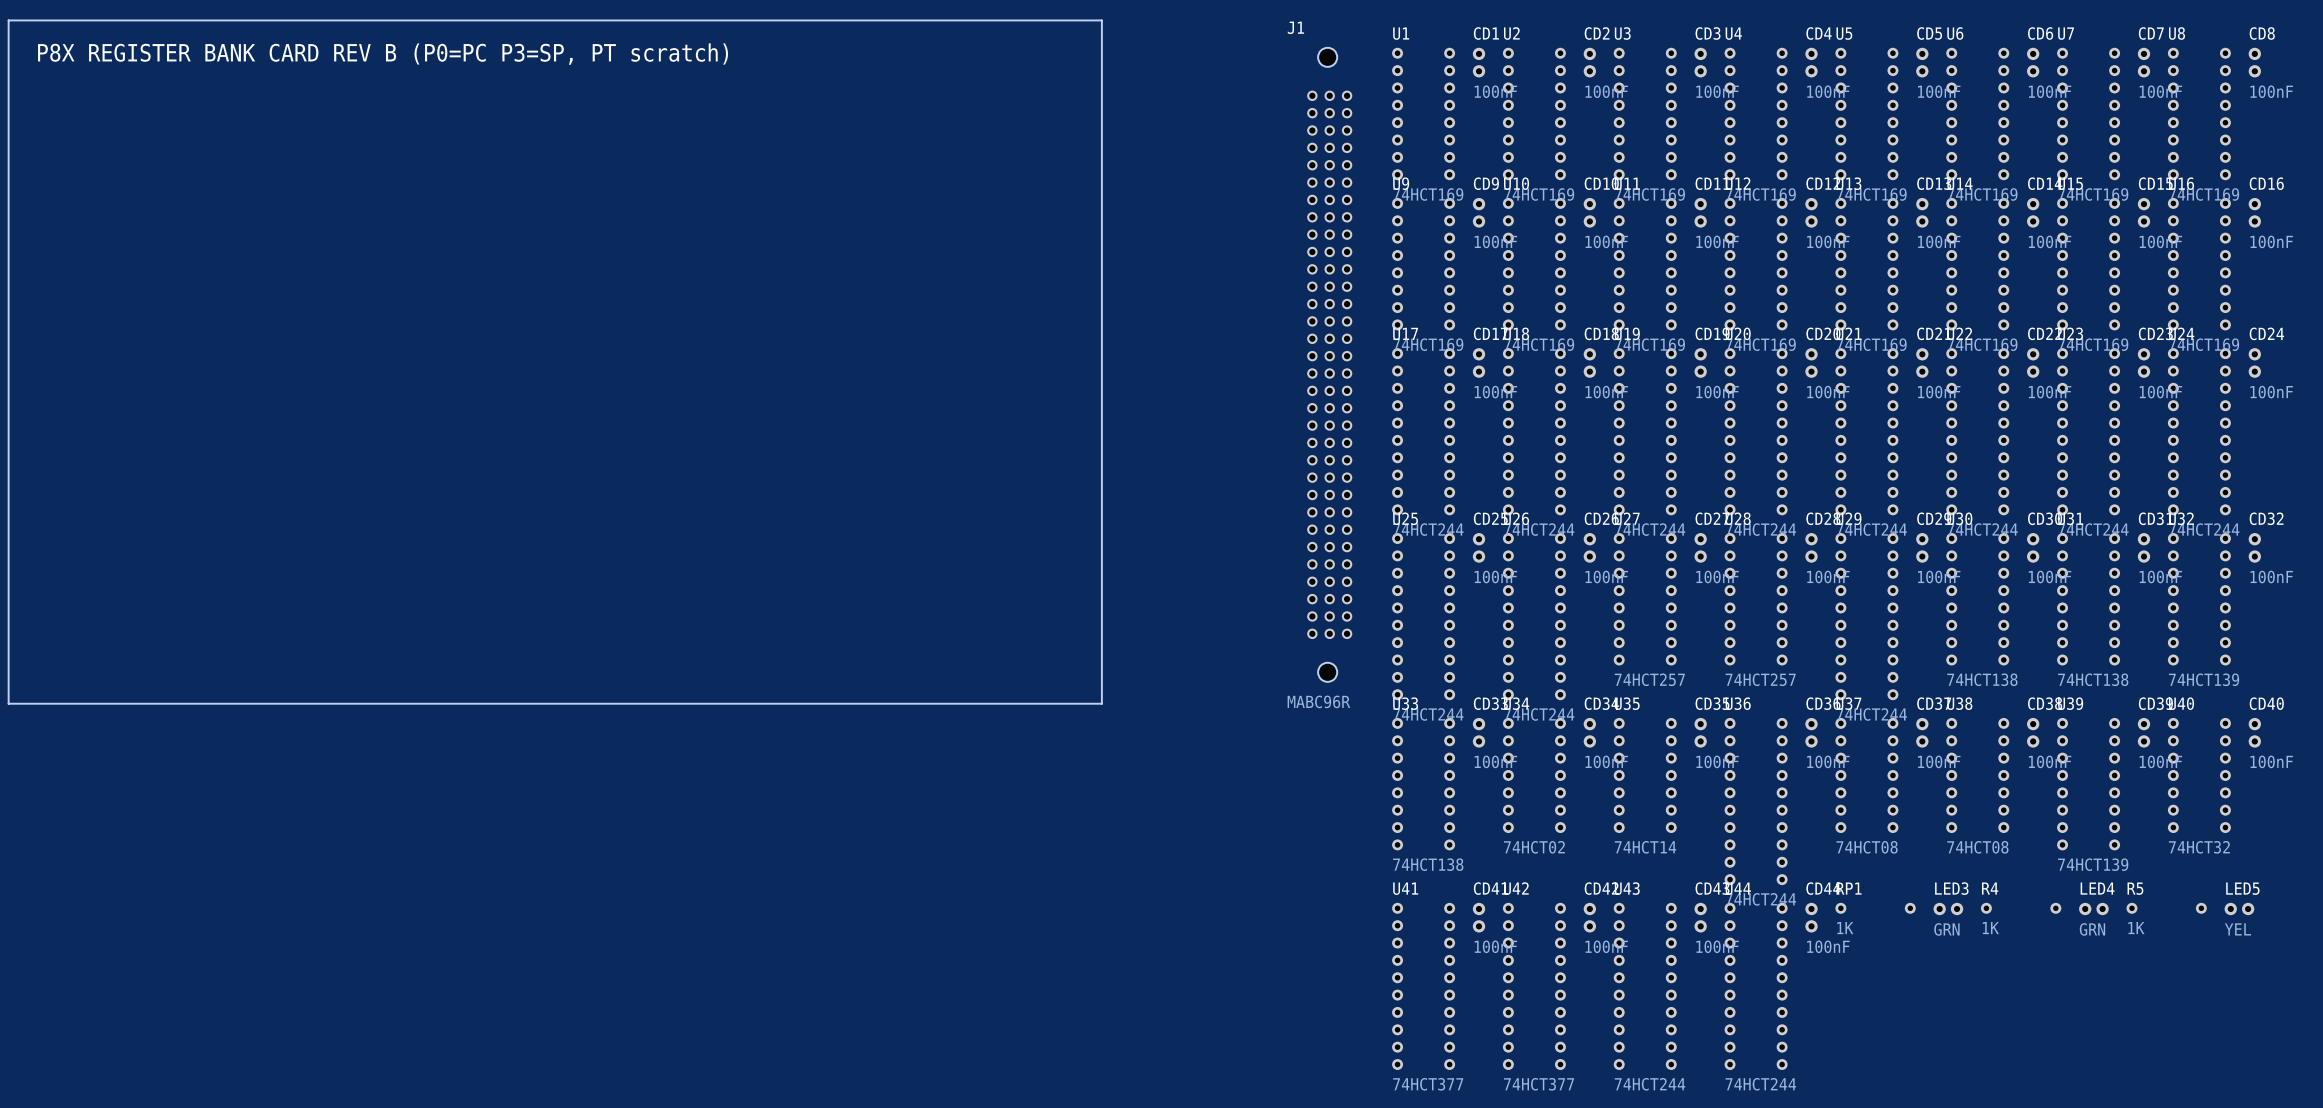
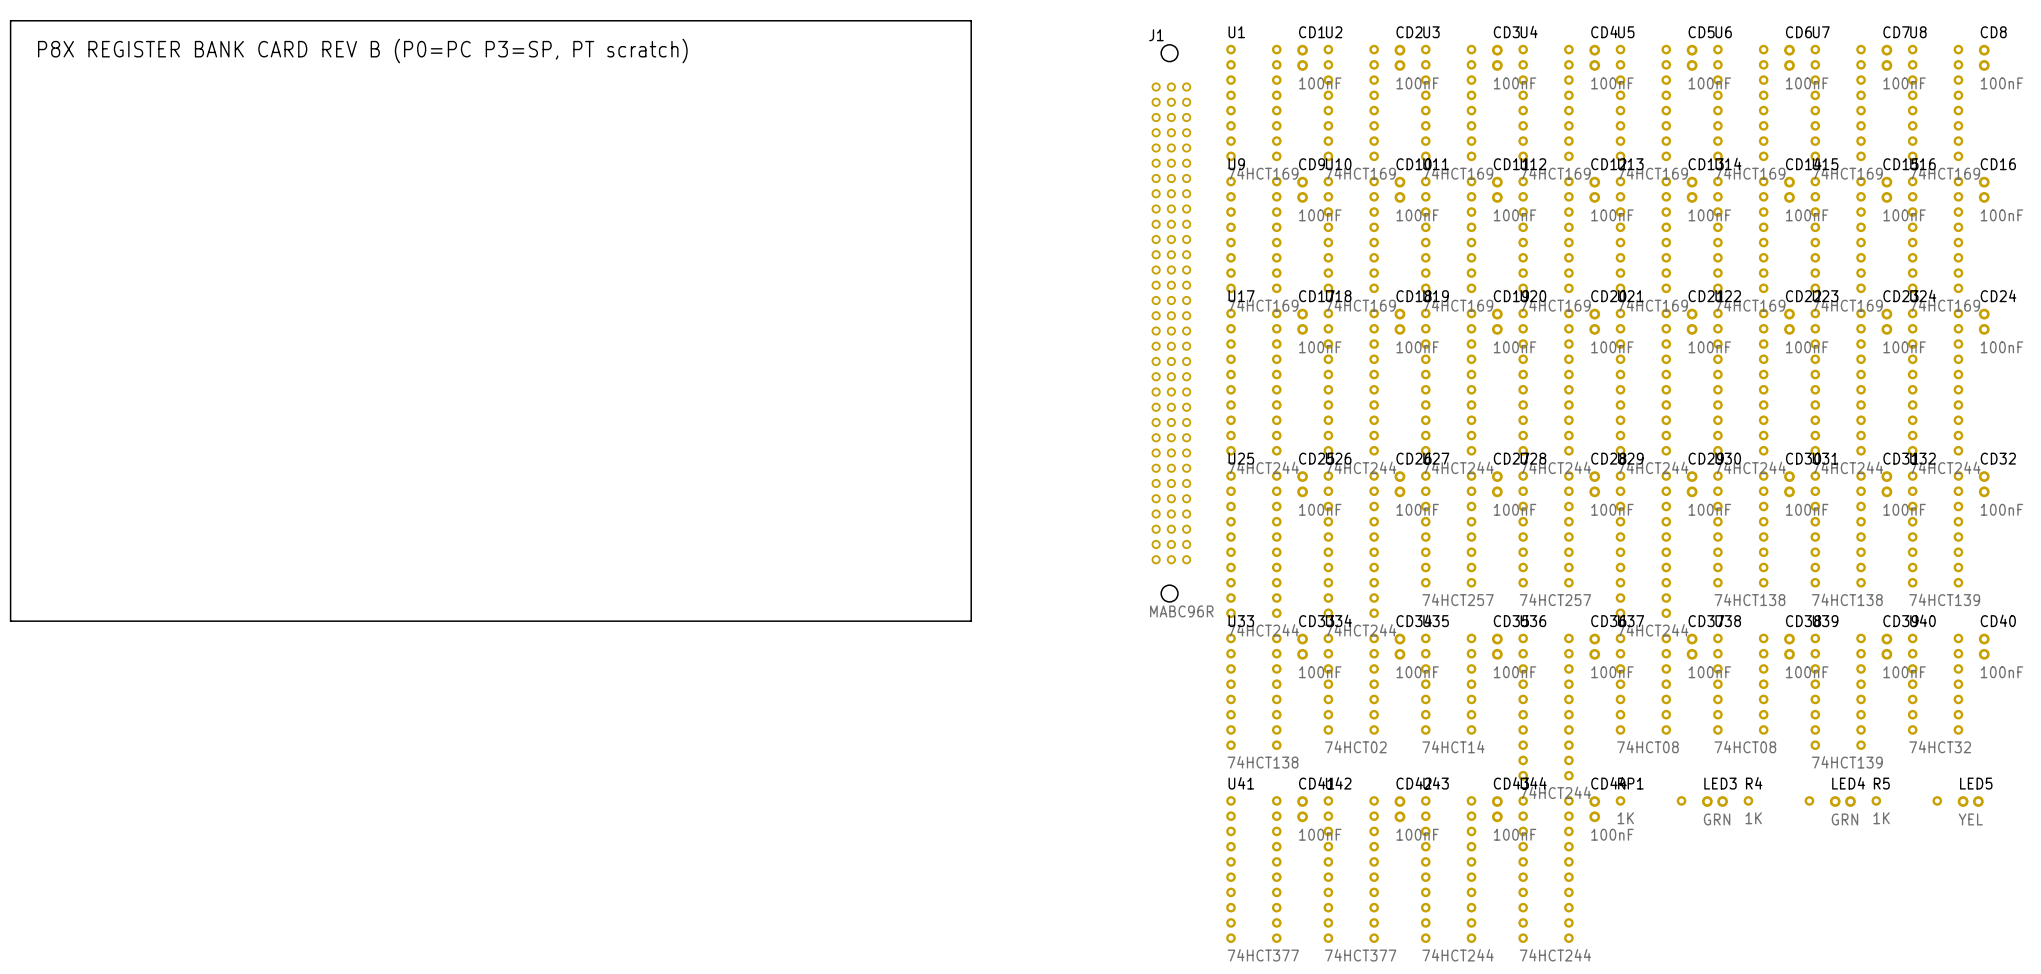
J1 name position: J1 (1295, 27) -> J1 (1156, 35)
J1 value position: MABC96R (1318, 701) -> MABC96R (1181, 611)

